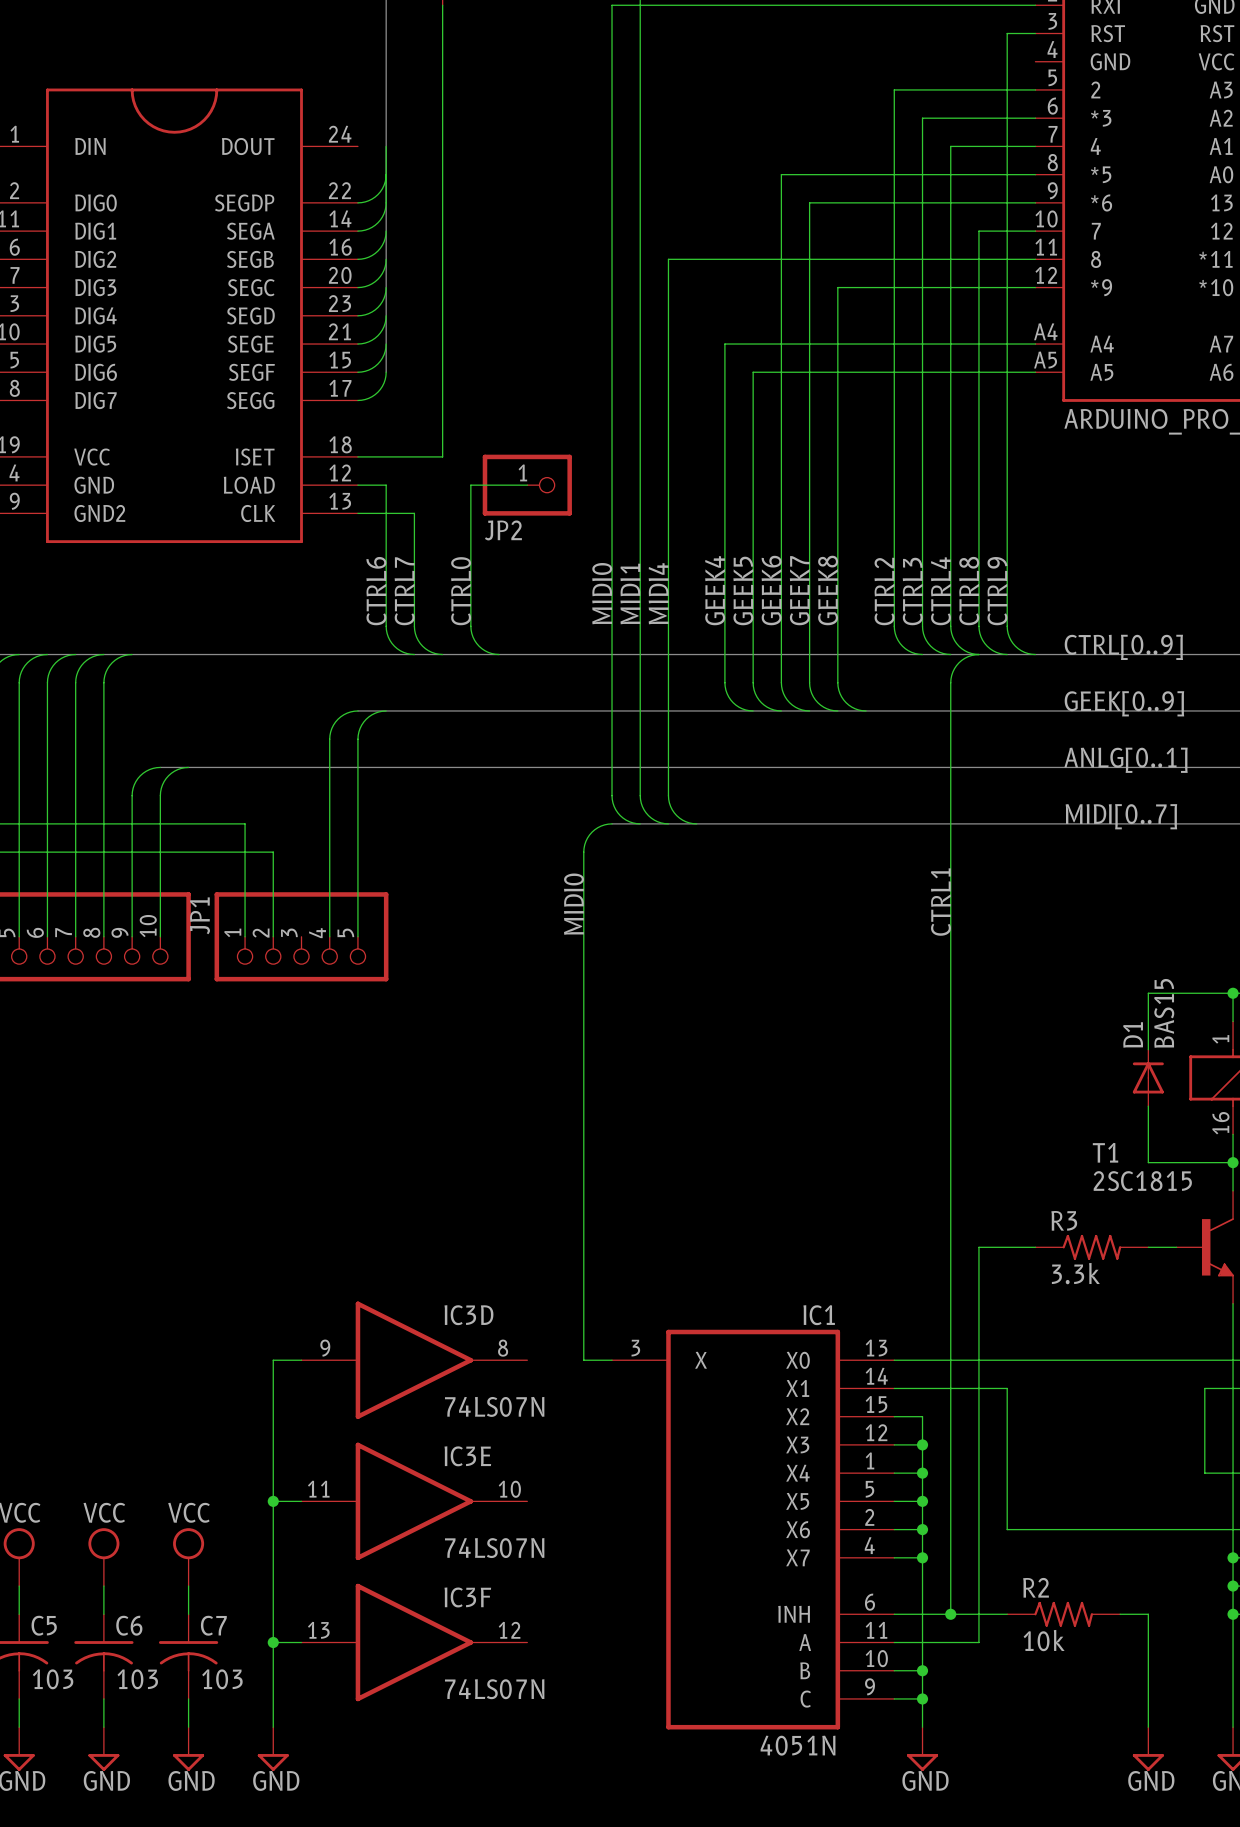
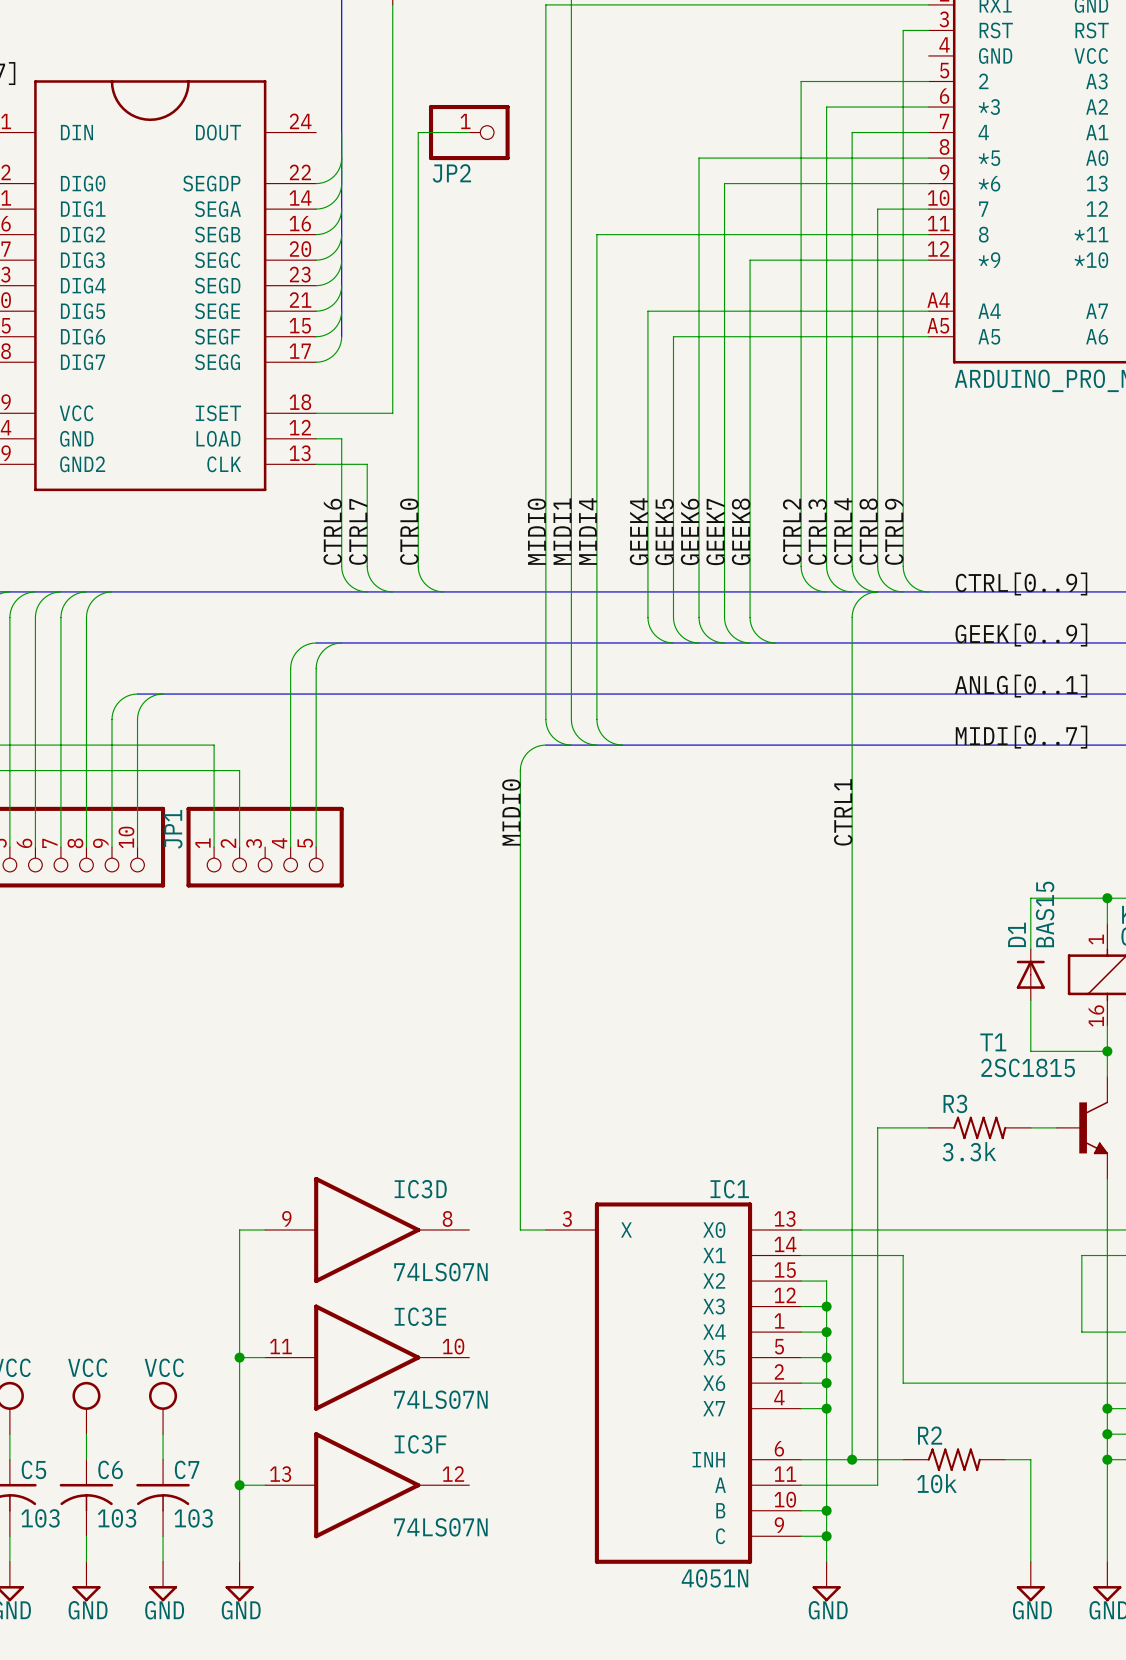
wire: (470, 485) (527, 485) -> (418, 438) (418, 132) (469, 132)
JP2 position: (527, 485) -> (469, 132)

